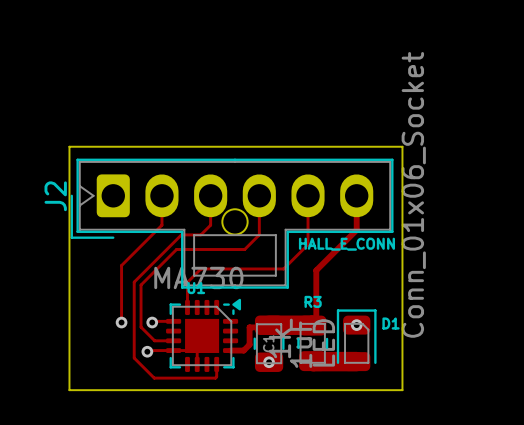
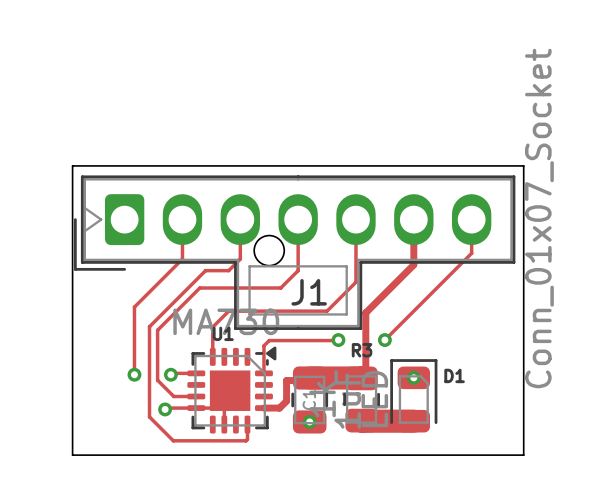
board edge: (402, 146) (402, 390) -> (468, 165) (523, 165) (523, 455) (468, 455)
track: none -> (471, 214) (471, 253) (384, 340)
J1: none -> Conn_01x07_Socket (294, 252)
J2: Conn_01x06_Socket (232, 223) -> none
text: HALL_E_CONN (346, 244) -> none
track: none -> (338, 340) (269, 340) (263, 345) (263, 373)
via: none -> (338, 340)
via: none -> (384, 340)

